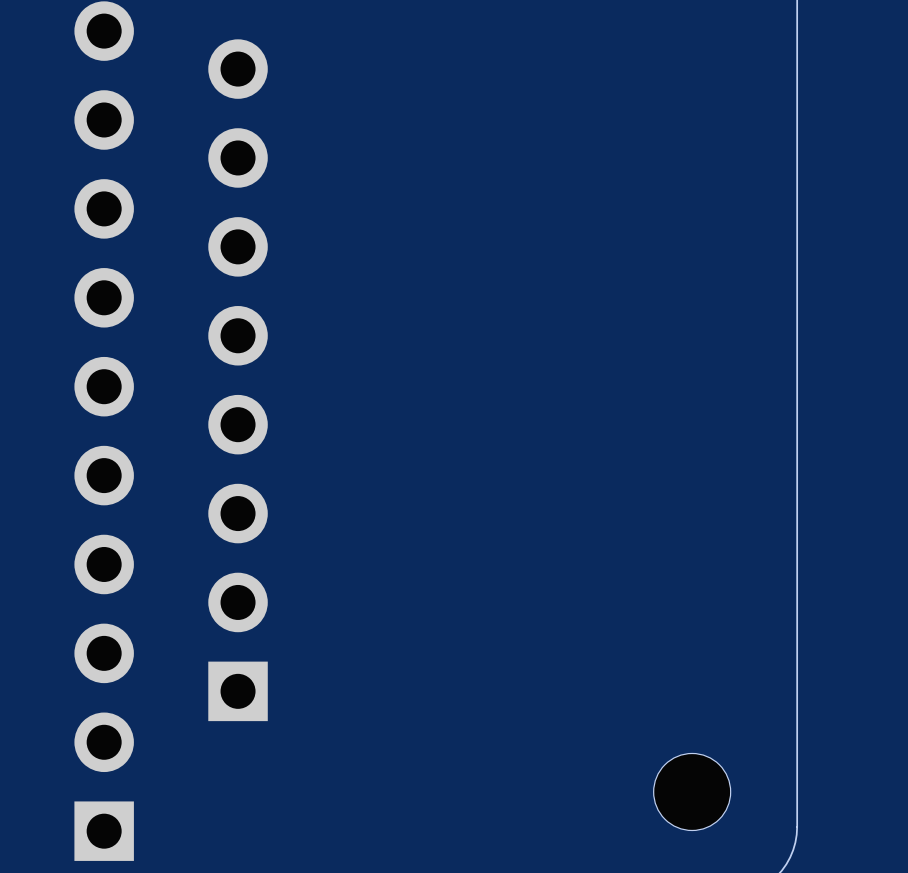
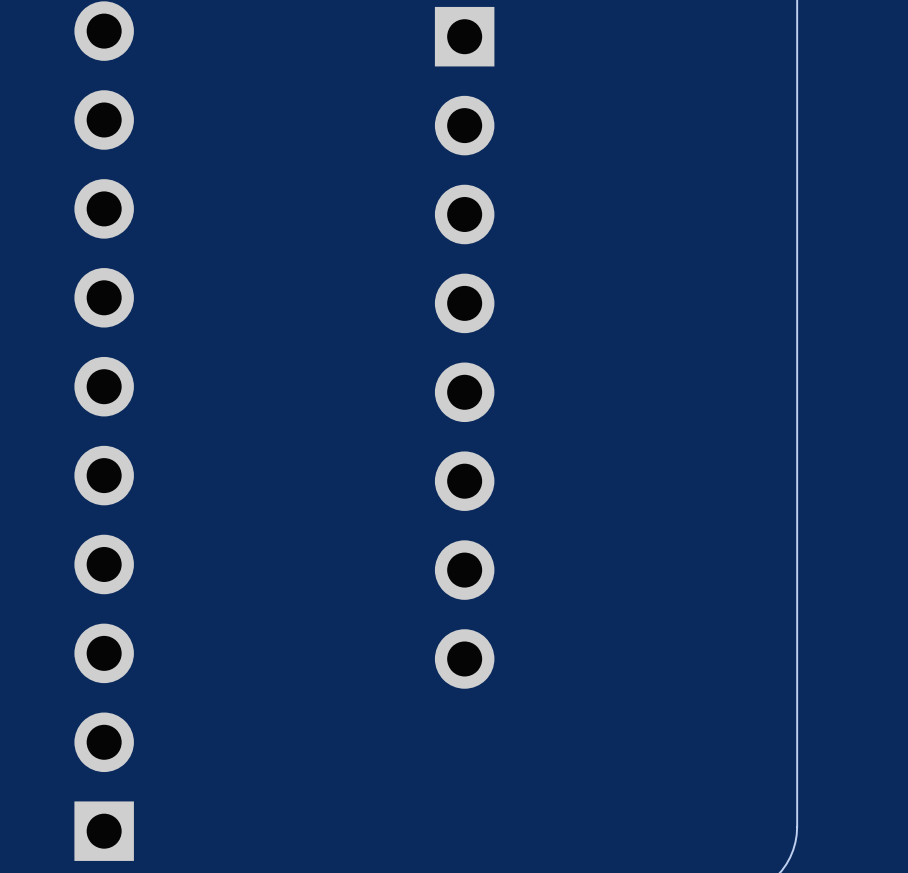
part rotation: 0° (238, 380) -> 180° (464, 347)
part: (692, 791) -> none

